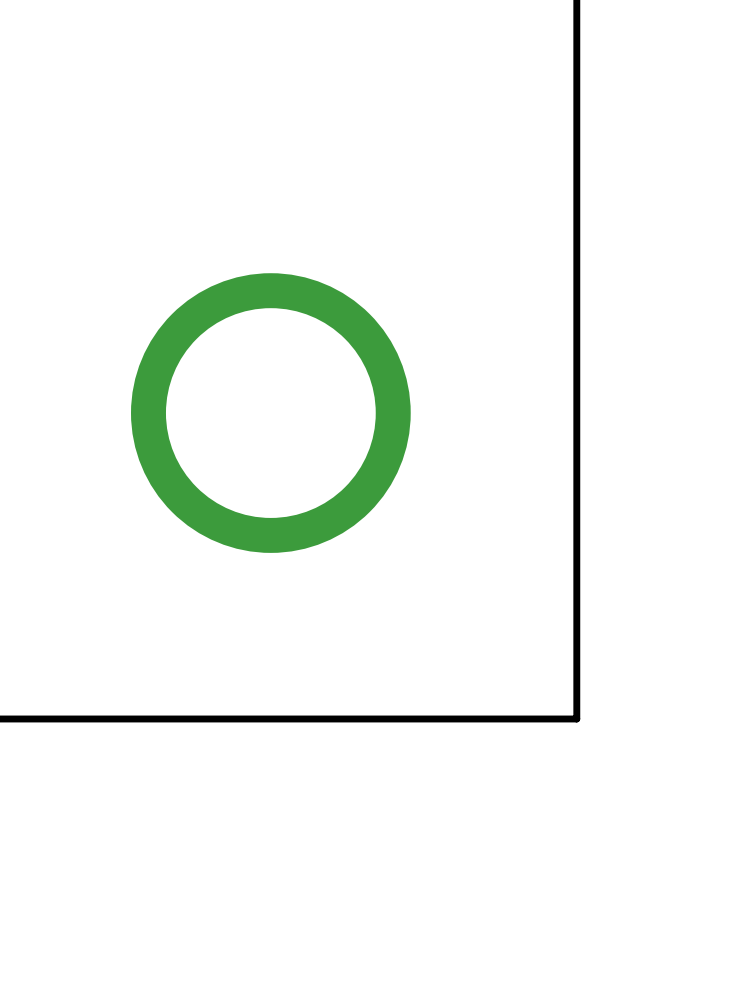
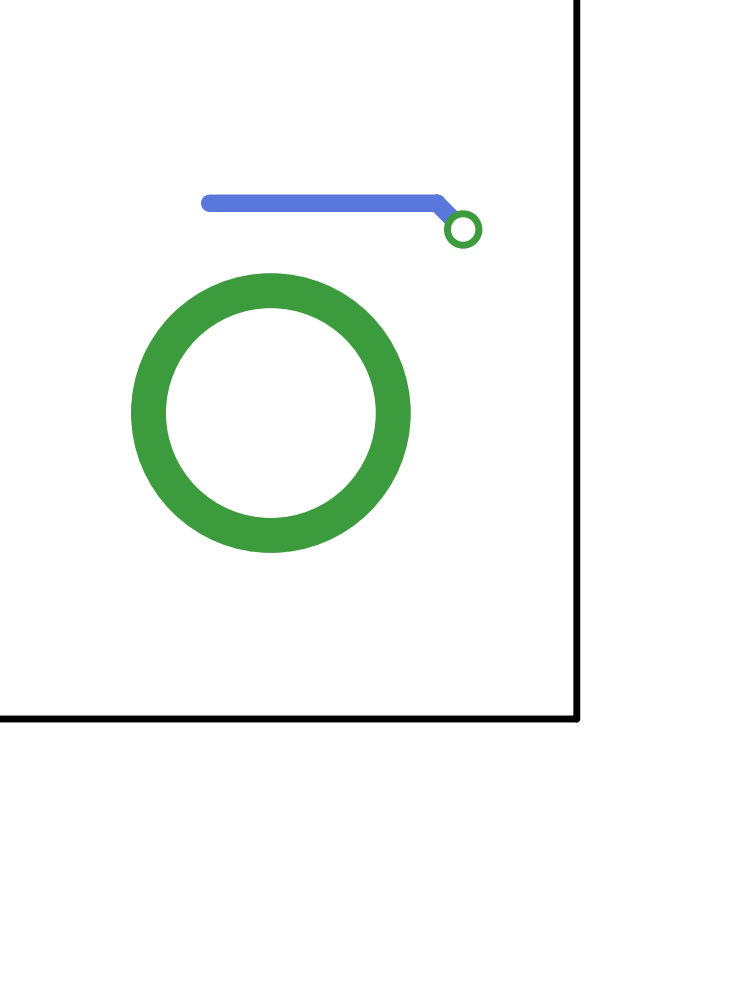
track: none -> (209, 203) (436, 203) (463, 229)
via: none -> (463, 229)

